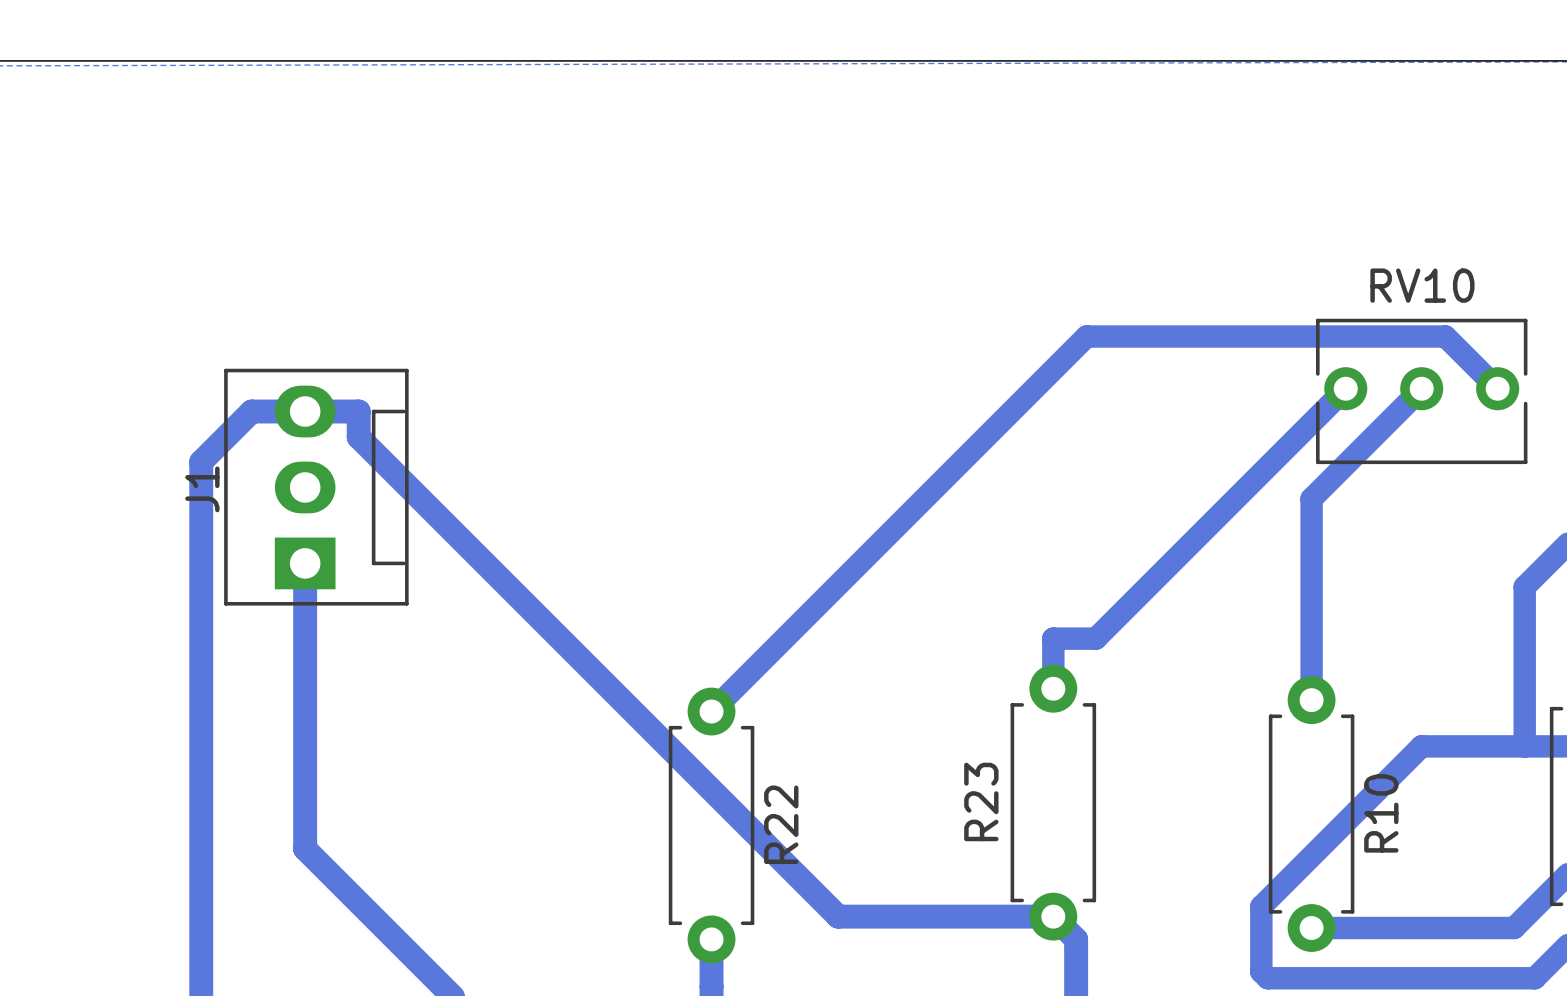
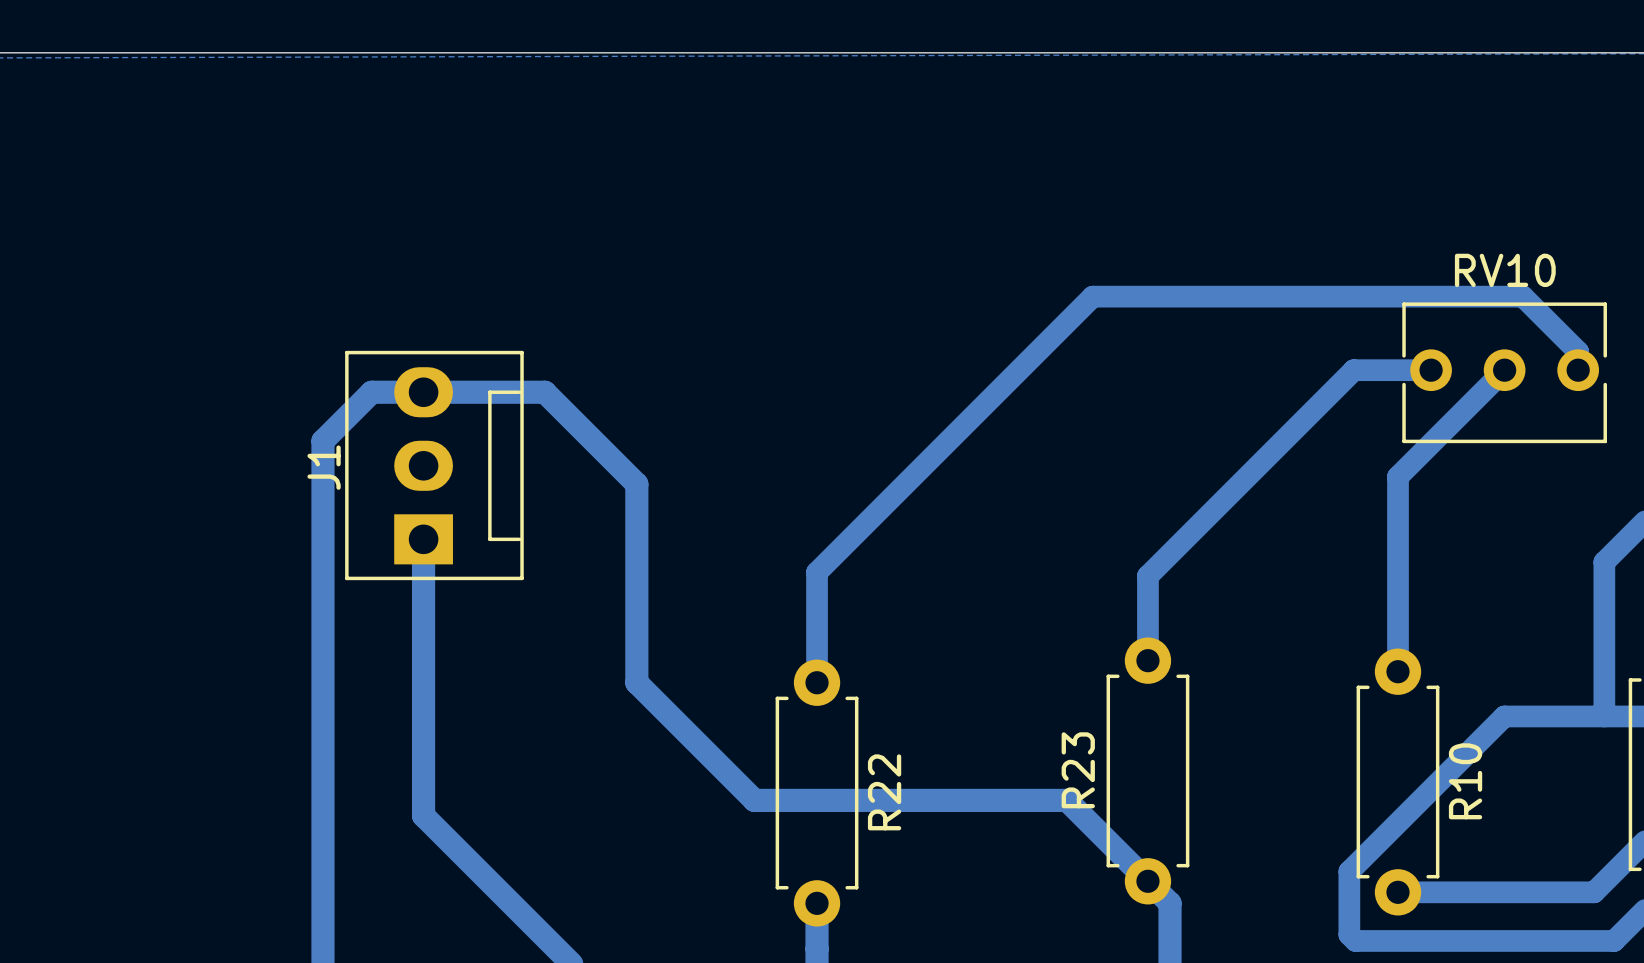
bottom track: (1345, 388) (1095, 638) (1053, 638) -> (1431, 370) (1353, 370) (1147, 576) (1147, 612)
bottom track: (1497, 388) (1445, 336) (1086, 336) (711, 711) -> (1578, 370) (1578, 351) (1523, 296) (1092, 296) (817, 572) (817, 682)
bottom track: (358, 411) (358, 437) (838, 916) (1053, 916) -> (475, 392) (544, 392) (636, 484) (636, 682) (754, 800) (1067, 800) (1147, 881)

